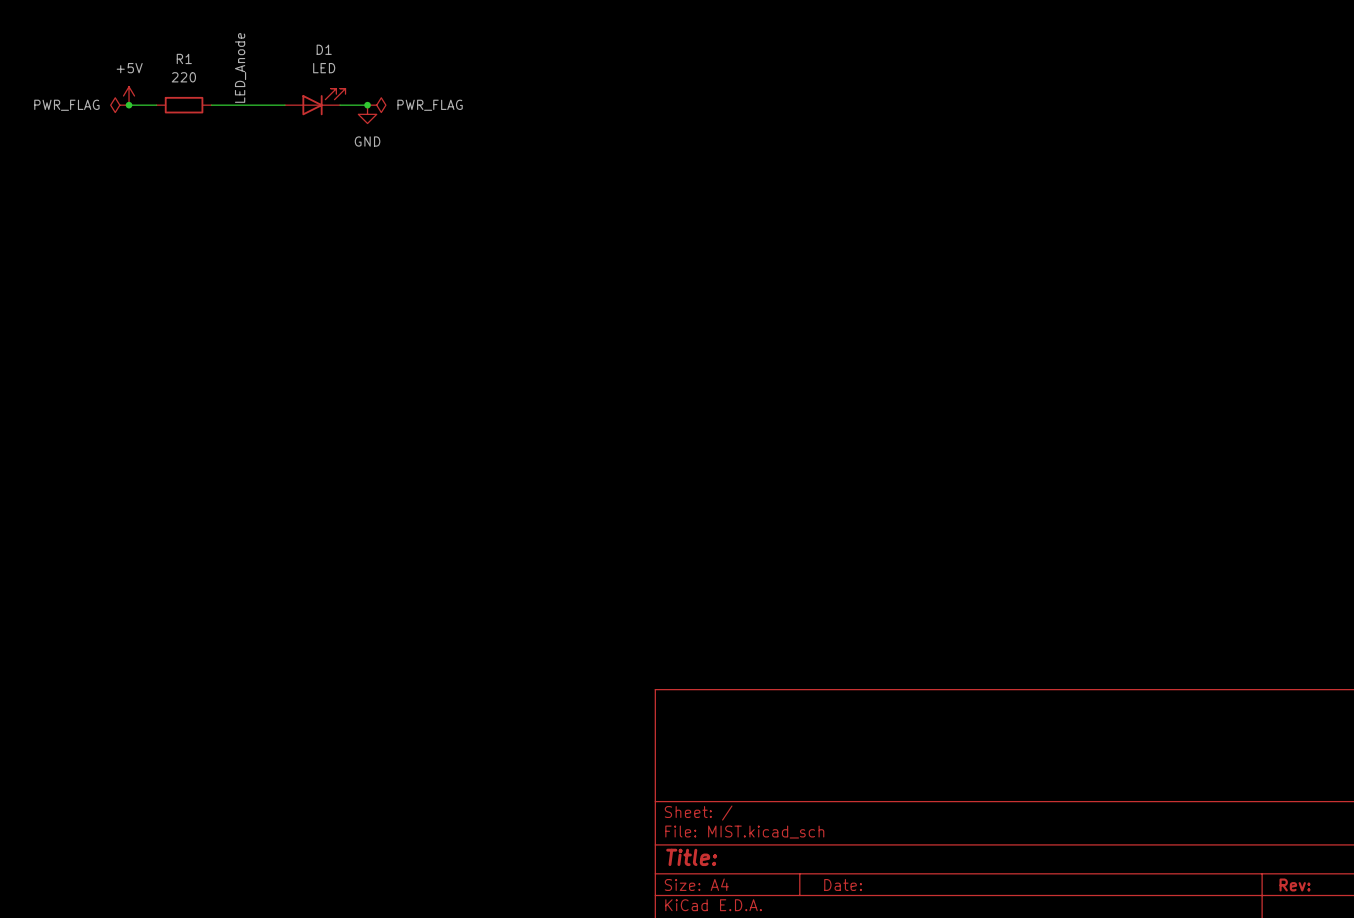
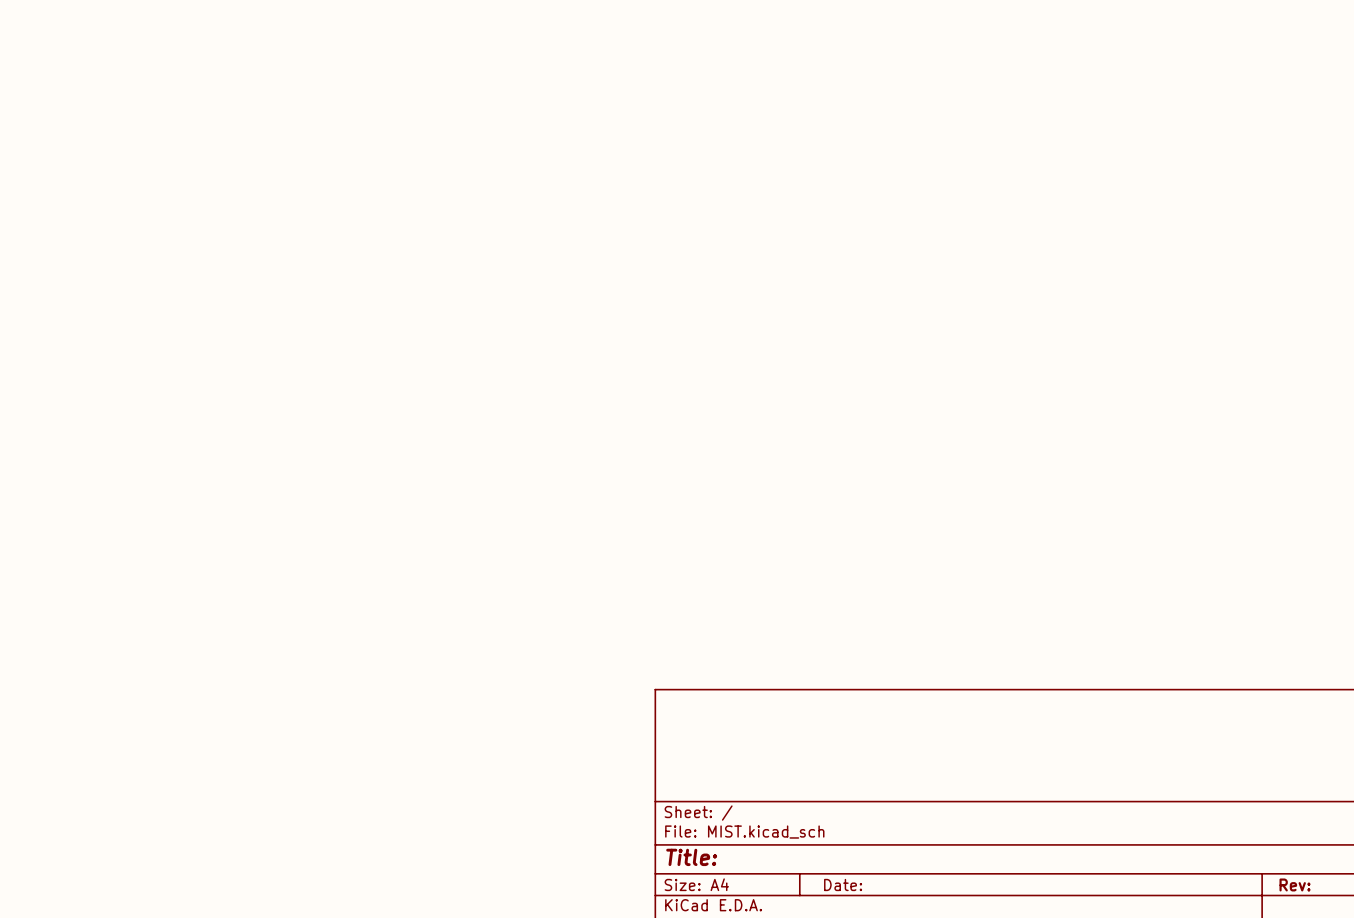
label: LED_Anode (240, 67) -> none
power symbol: +5V (129, 95) -> none
D1: LED (315, 101) -> none
power symbol: PWR_FLAG (119, 105) -> none
wire: (129, 105) (156, 105) -> none
junction: (129, 105) -> none
R1: 220 (184, 105) -> none
wire: (211, 105) (284, 105) -> none
wire: (340, 105) (367, 105) -> none
junction: (367, 105) -> none
power symbol: PWR_FLAG (376, 105) -> none
power symbol: GND (367, 114) -> none

